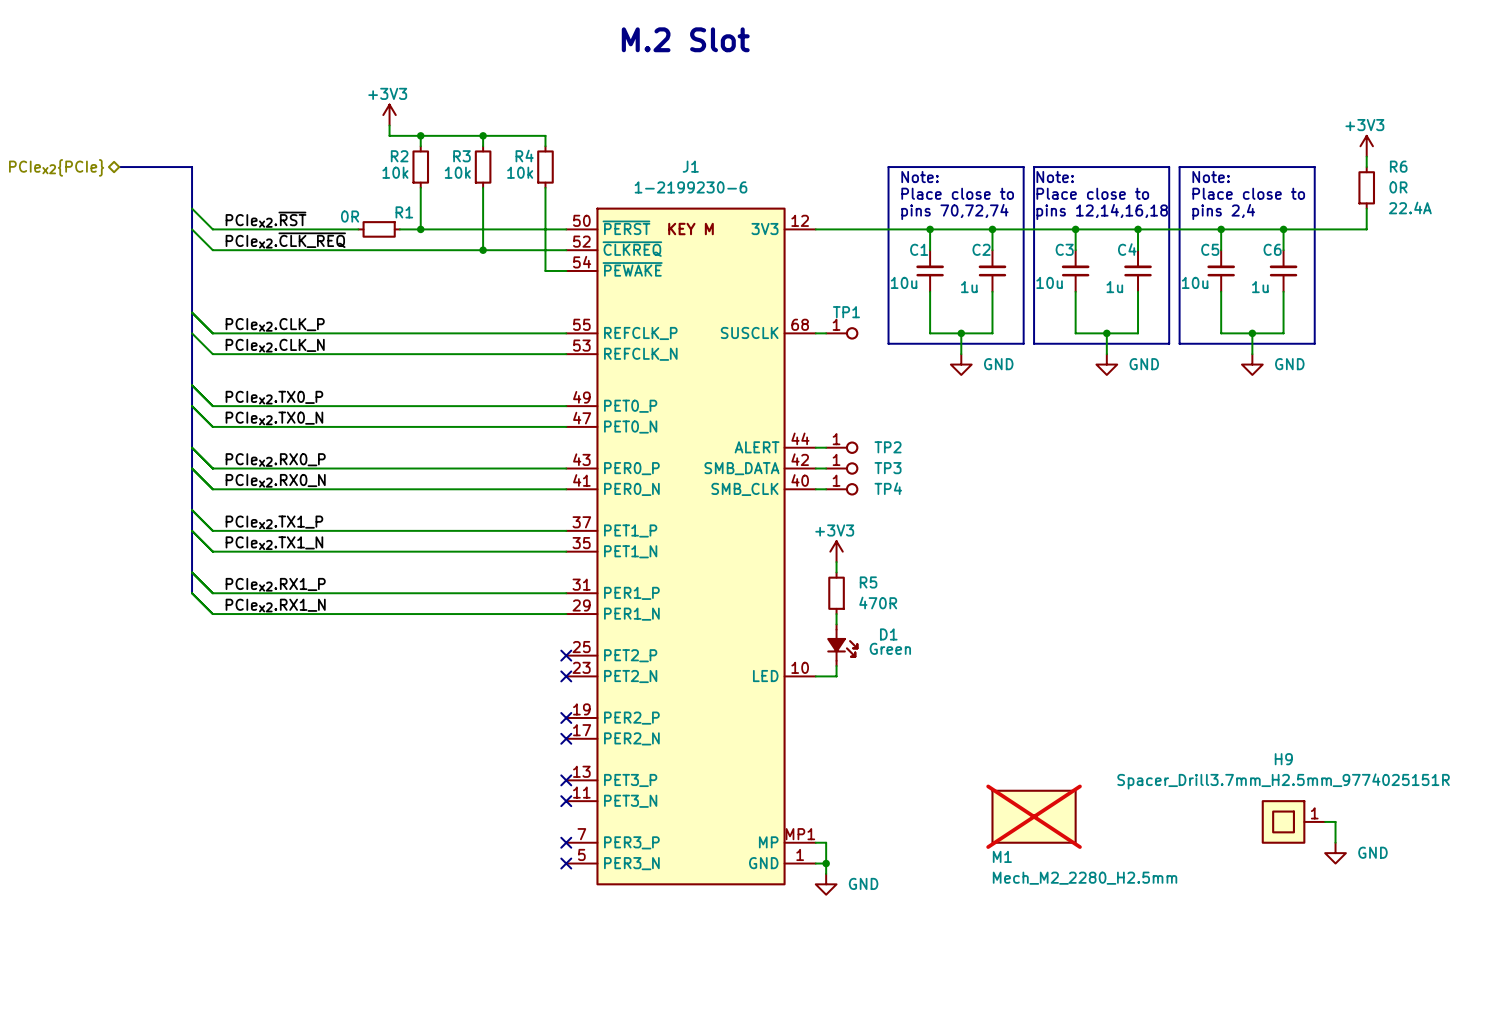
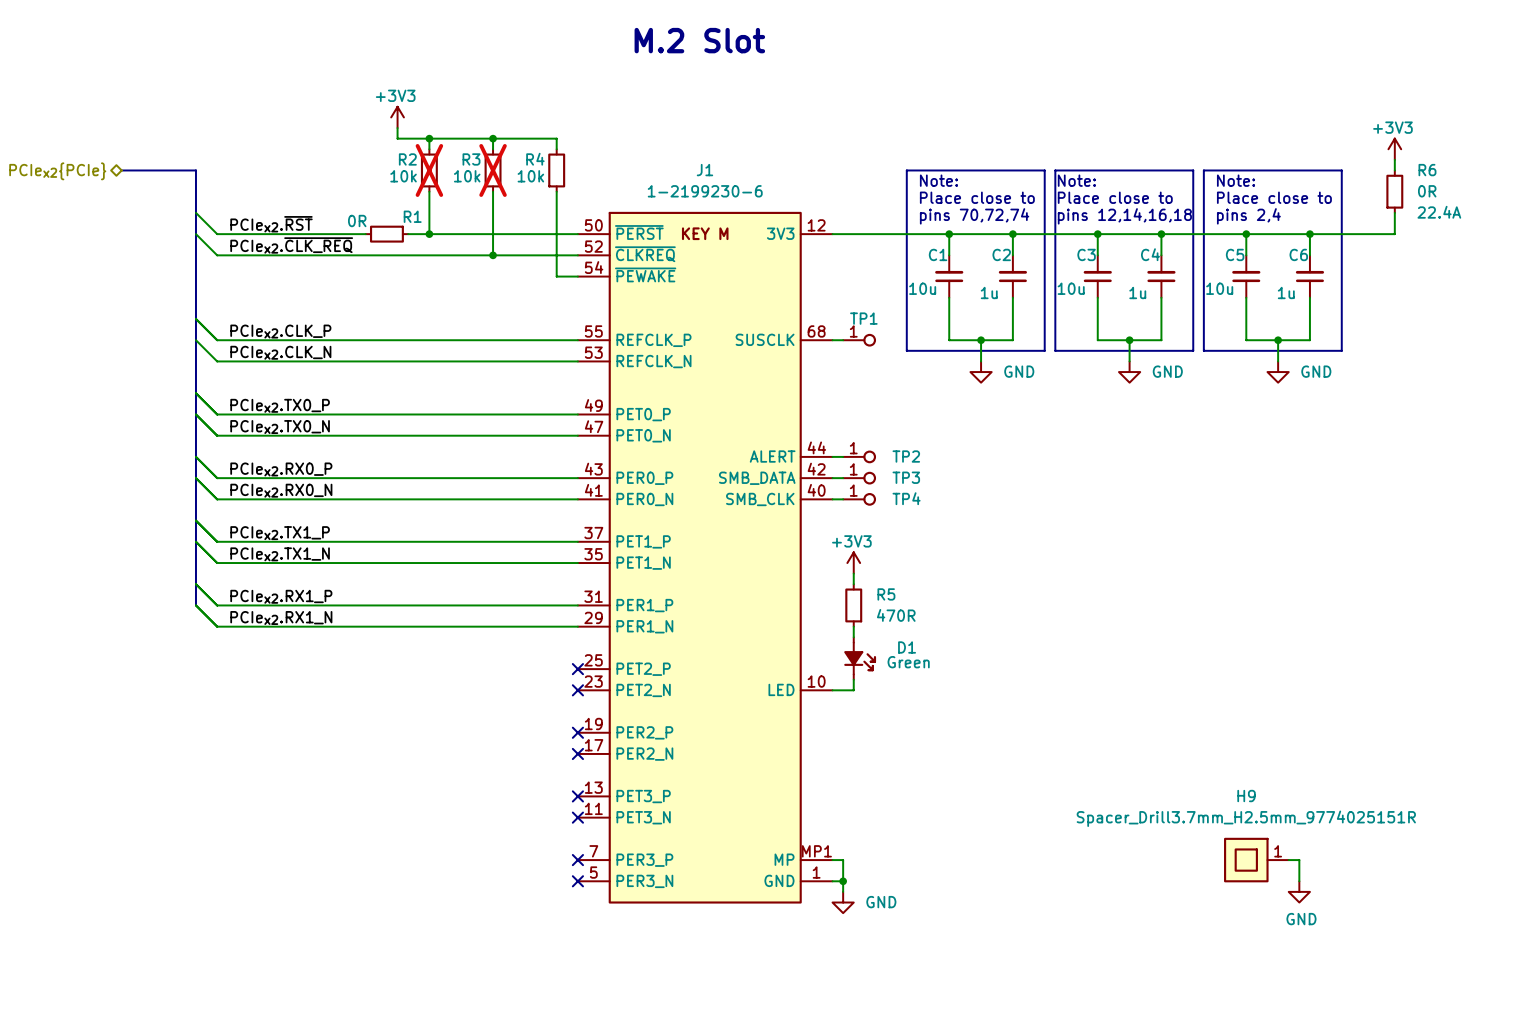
R2 do-not-place cross: none -> (429, 170)
R3 do-not-place cross: none -> (493, 170)
M1: Mech_M2_2280_H2.5mm (1034, 816) -> none
H9 position: (1293, 821) -> (1256, 860)
wire: (1325, 821) (1335, 821) (1335, 842) -> (1288, 860) (1299, 860) (1299, 881)
power symbol text position: GND (1372, 852) -> GND (1301, 919)
power symbol position: GND (1335, 853) -> GND (1299, 891)

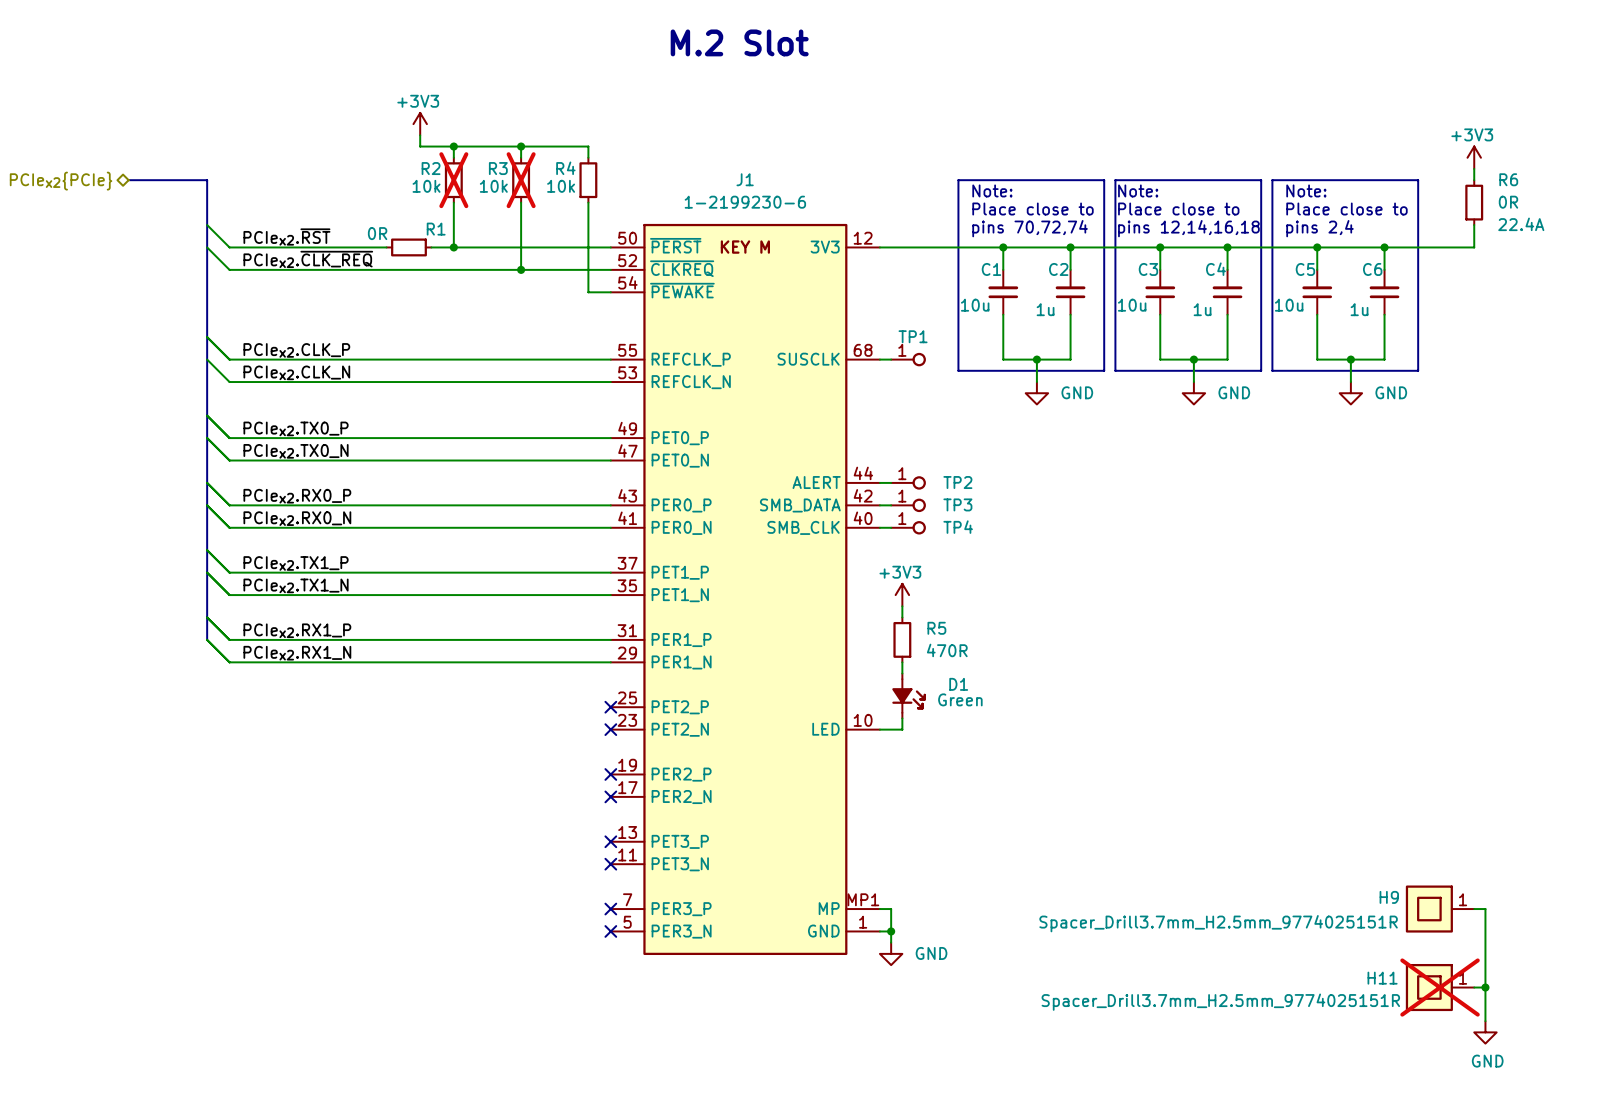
H9 name position: H9 (1246, 796) -> H9 (1389, 897)
H9 value position: Spacer_Drill3.7mm_H2.5mm_9774025151R (1246, 818) -> Spacer_Drill3.7mm_H2.5mm_9774025151R (1218, 923)
H9 position: (1256, 860) -> (1440, 909)
wire: (1288, 860) (1299, 860) (1299, 881) -> none
wire: none -> (1474, 909) (1485, 909) (1485, 1021)
power symbol position: GND (1299, 891) -> GND (1485, 1032)
H11: none -> Spacer_Drill3.7mm_H2.5mm_9774025151R (1440, 987)
wire: none -> (1474, 987) (1485, 987)
junction: none -> (1485, 987)

